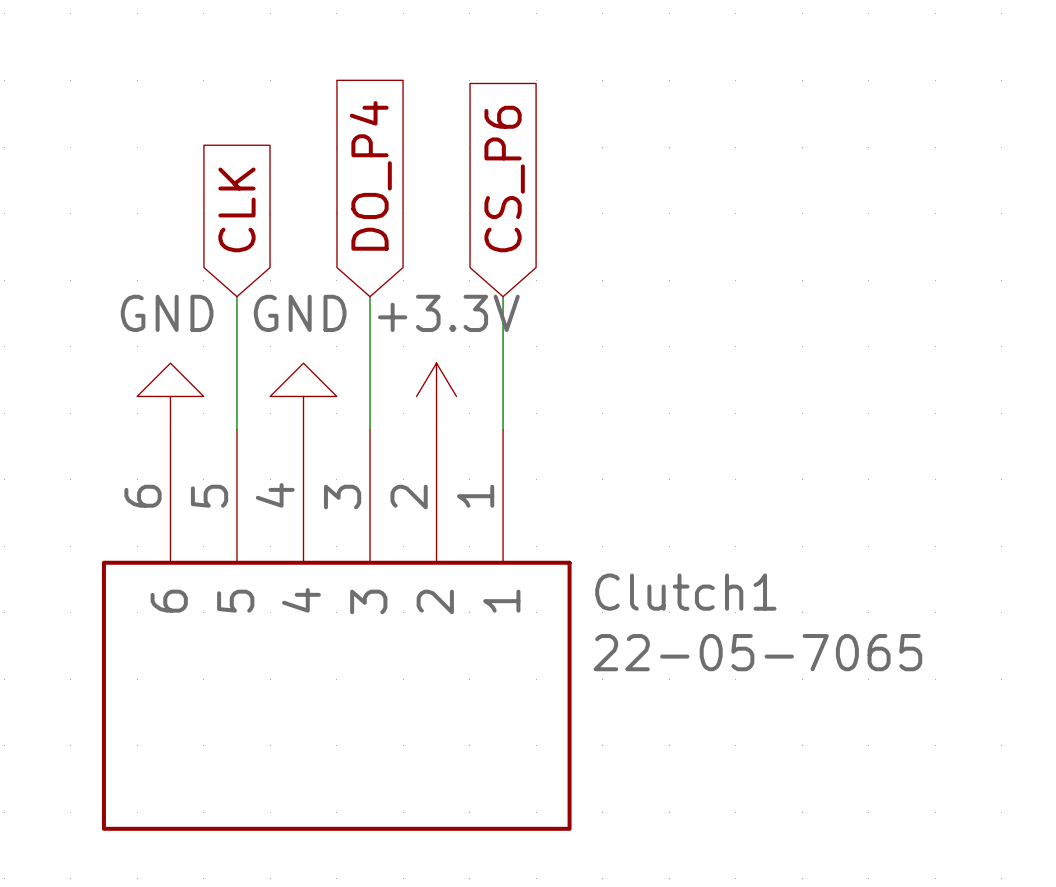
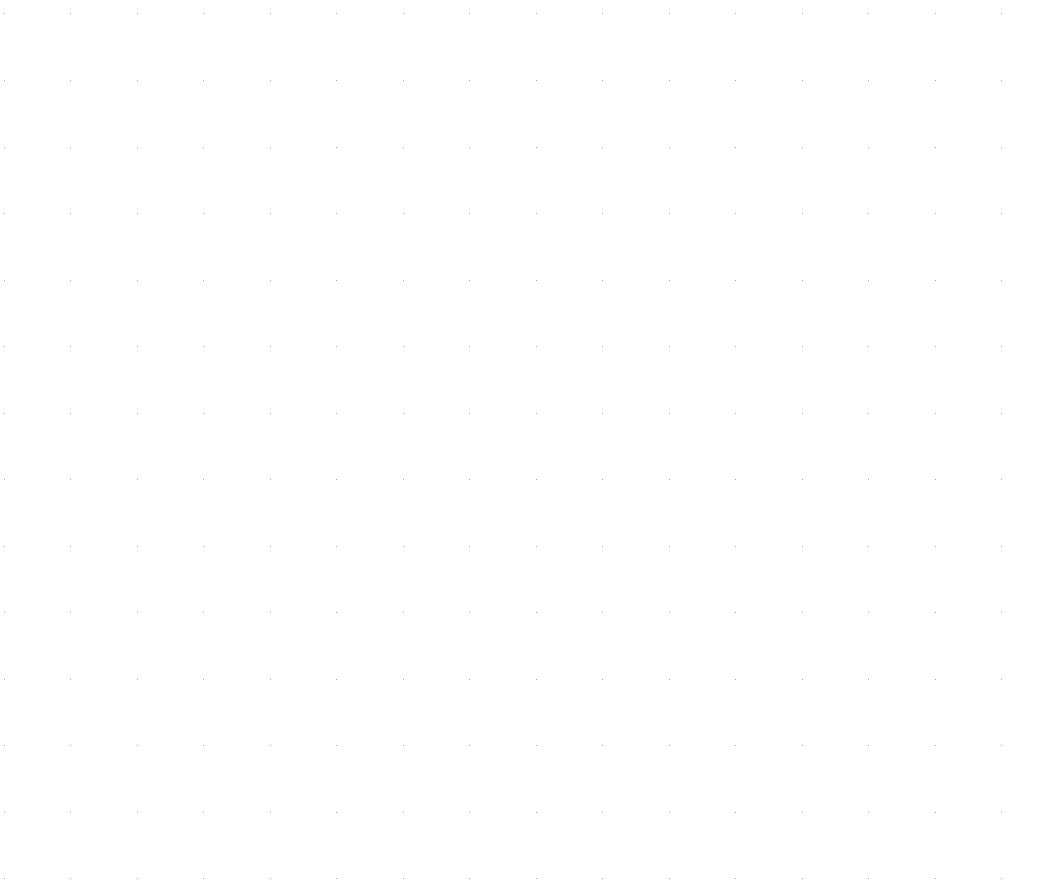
global label: DO_P4 (370, 175) -> none
global label: CS_P6 (504, 179) -> none
global label: CLK (236, 209) -> none
wire: (236, 296) (236, 429) -> none
wire: (370, 296) (370, 429) -> none
wire: (503, 296) (503, 429) -> none
power symbol: GND (170, 396) -> none
power symbol: GND (303, 396) -> none
power symbol: +3.3V (436, 396) -> none
Clutch1: 22-05-7065 (336, 630) -> none

